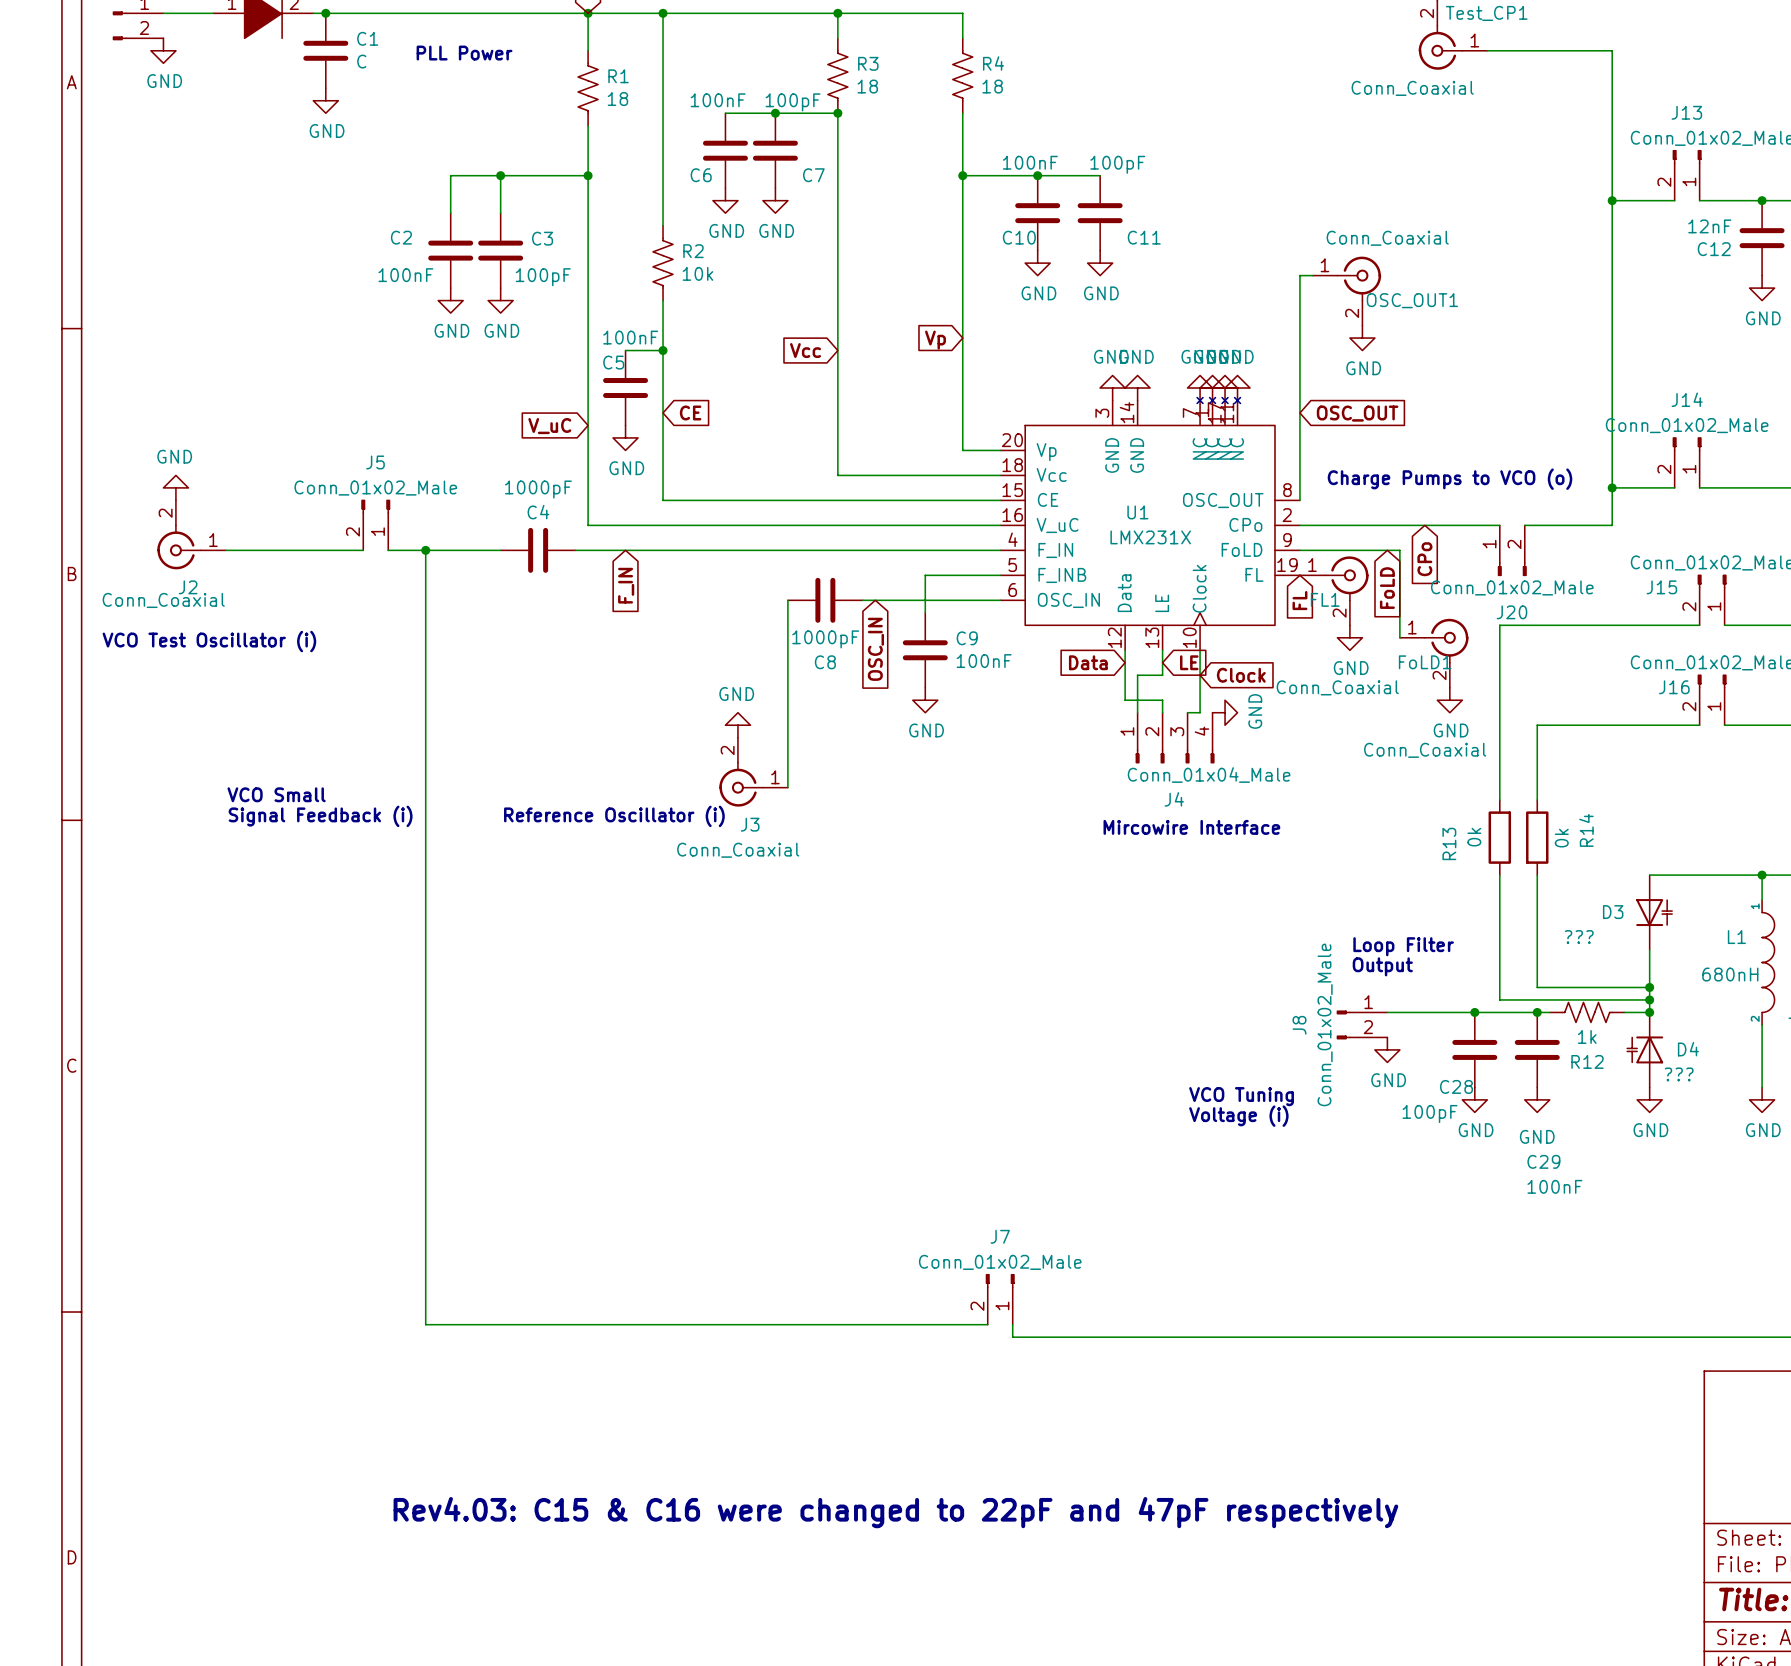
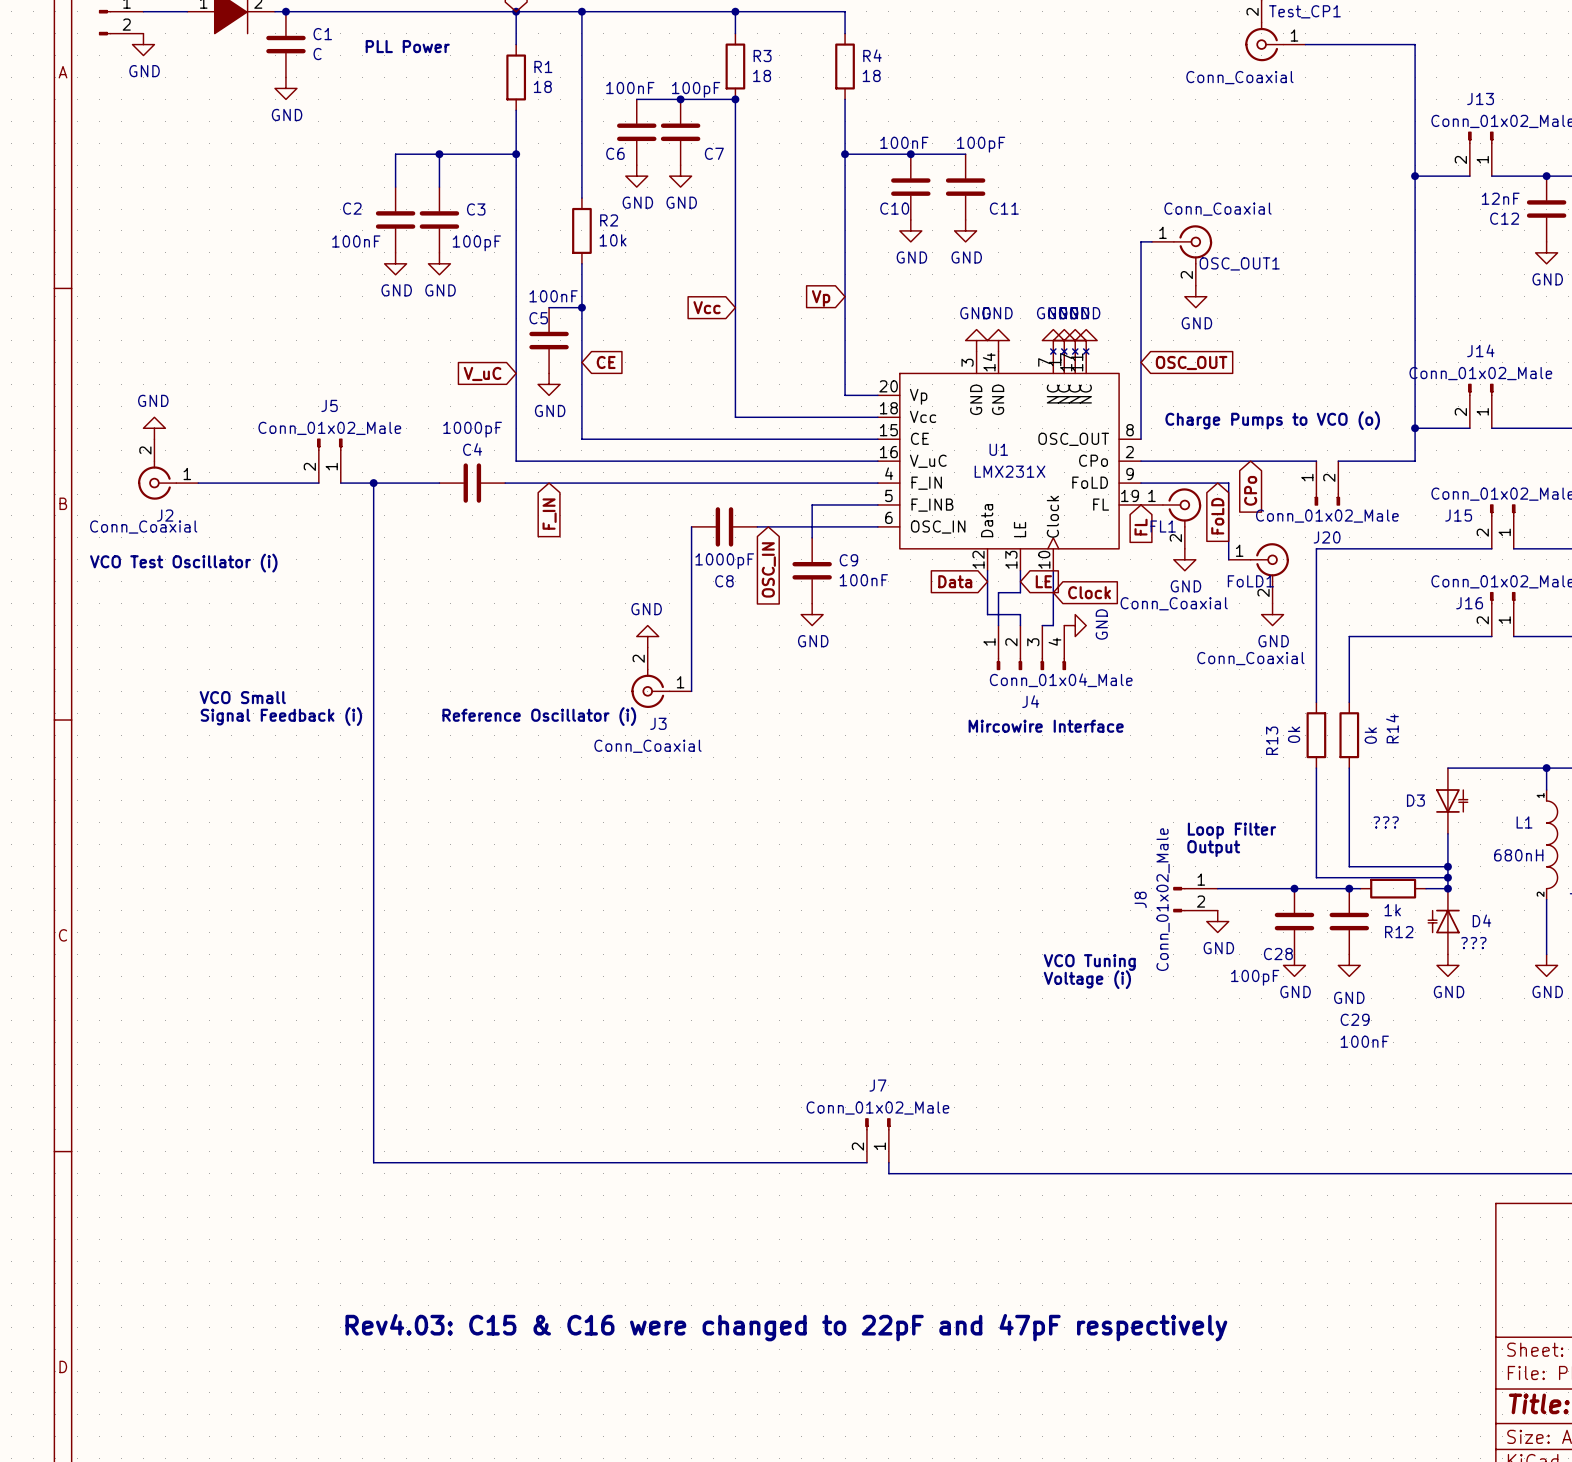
R3 symbol: [827, 38, 848, 114] -> [725, 33, 746, 100]
R4 symbol: [952, 38, 973, 114] -> [835, 33, 855, 100]
R1 symbol: [578, 50, 599, 126] -> [506, 44, 527, 111]
R2 symbol: [653, 225, 674, 301] -> [572, 198, 592, 264]
R12 symbol: [1549, 1002, 1625, 1023] -> [1360, 878, 1427, 899]

